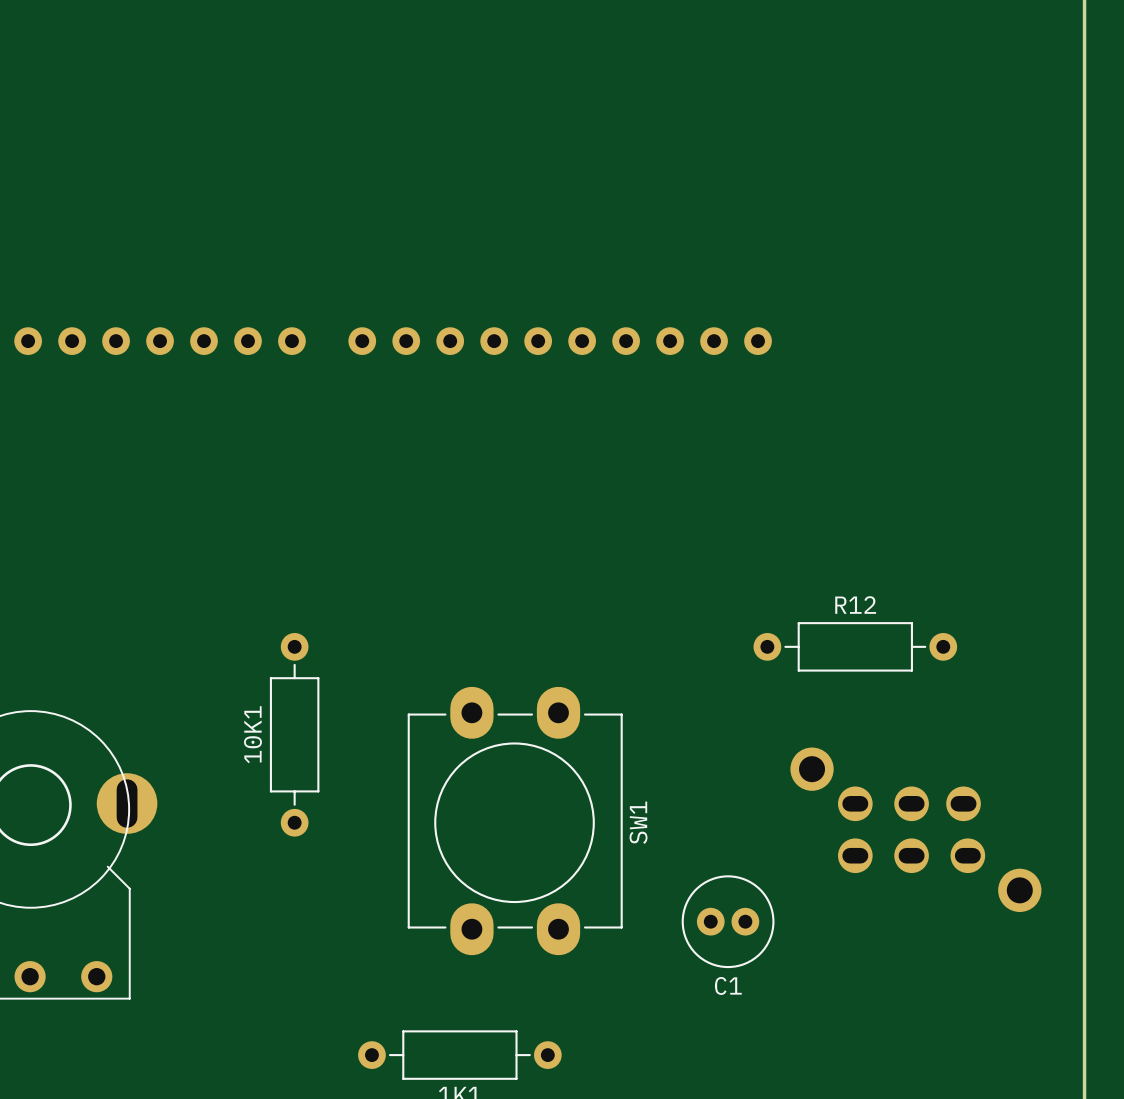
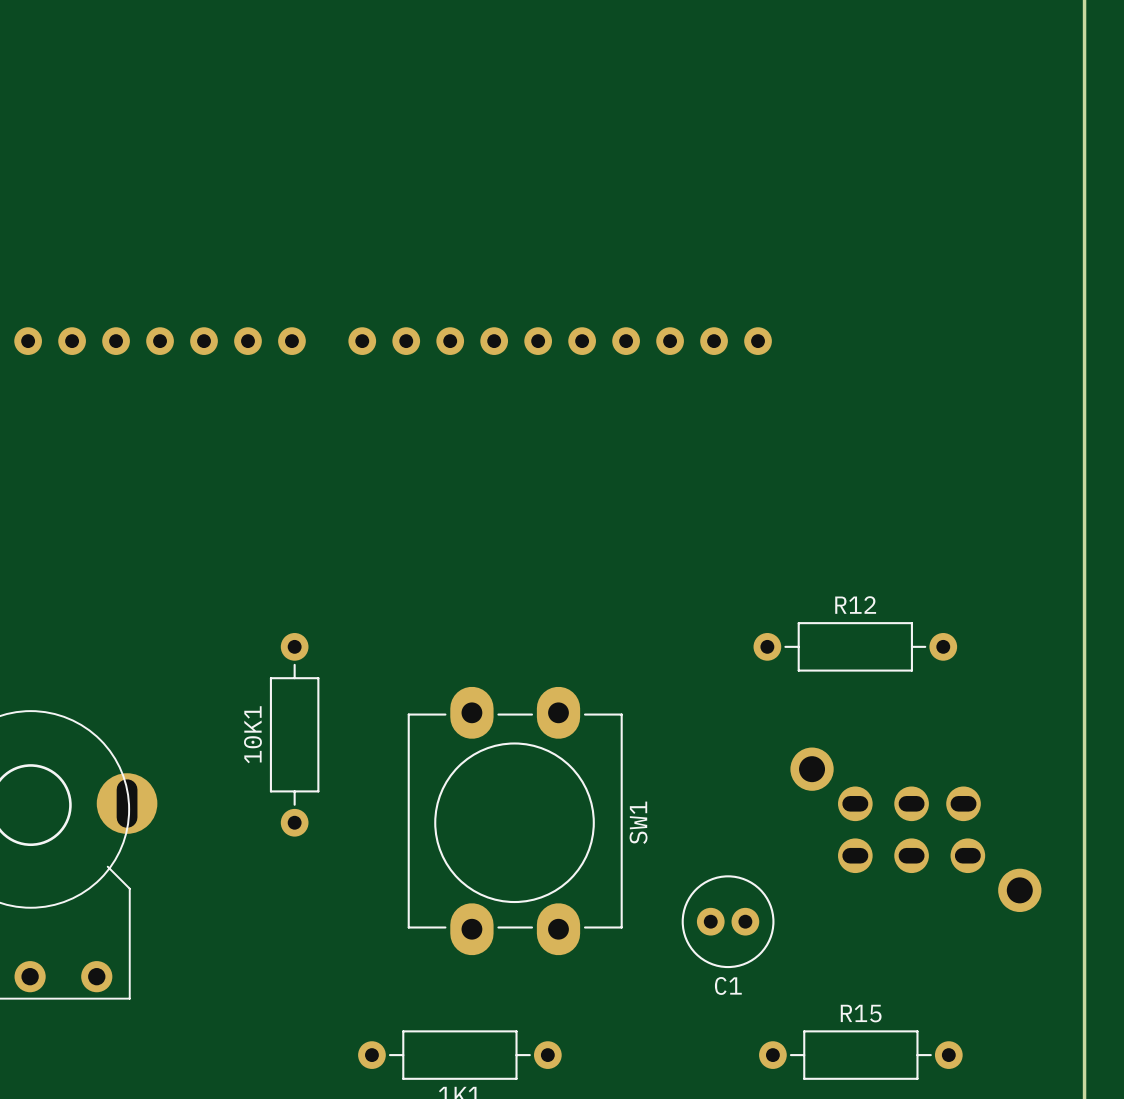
R15: none -> (860, 1055)

